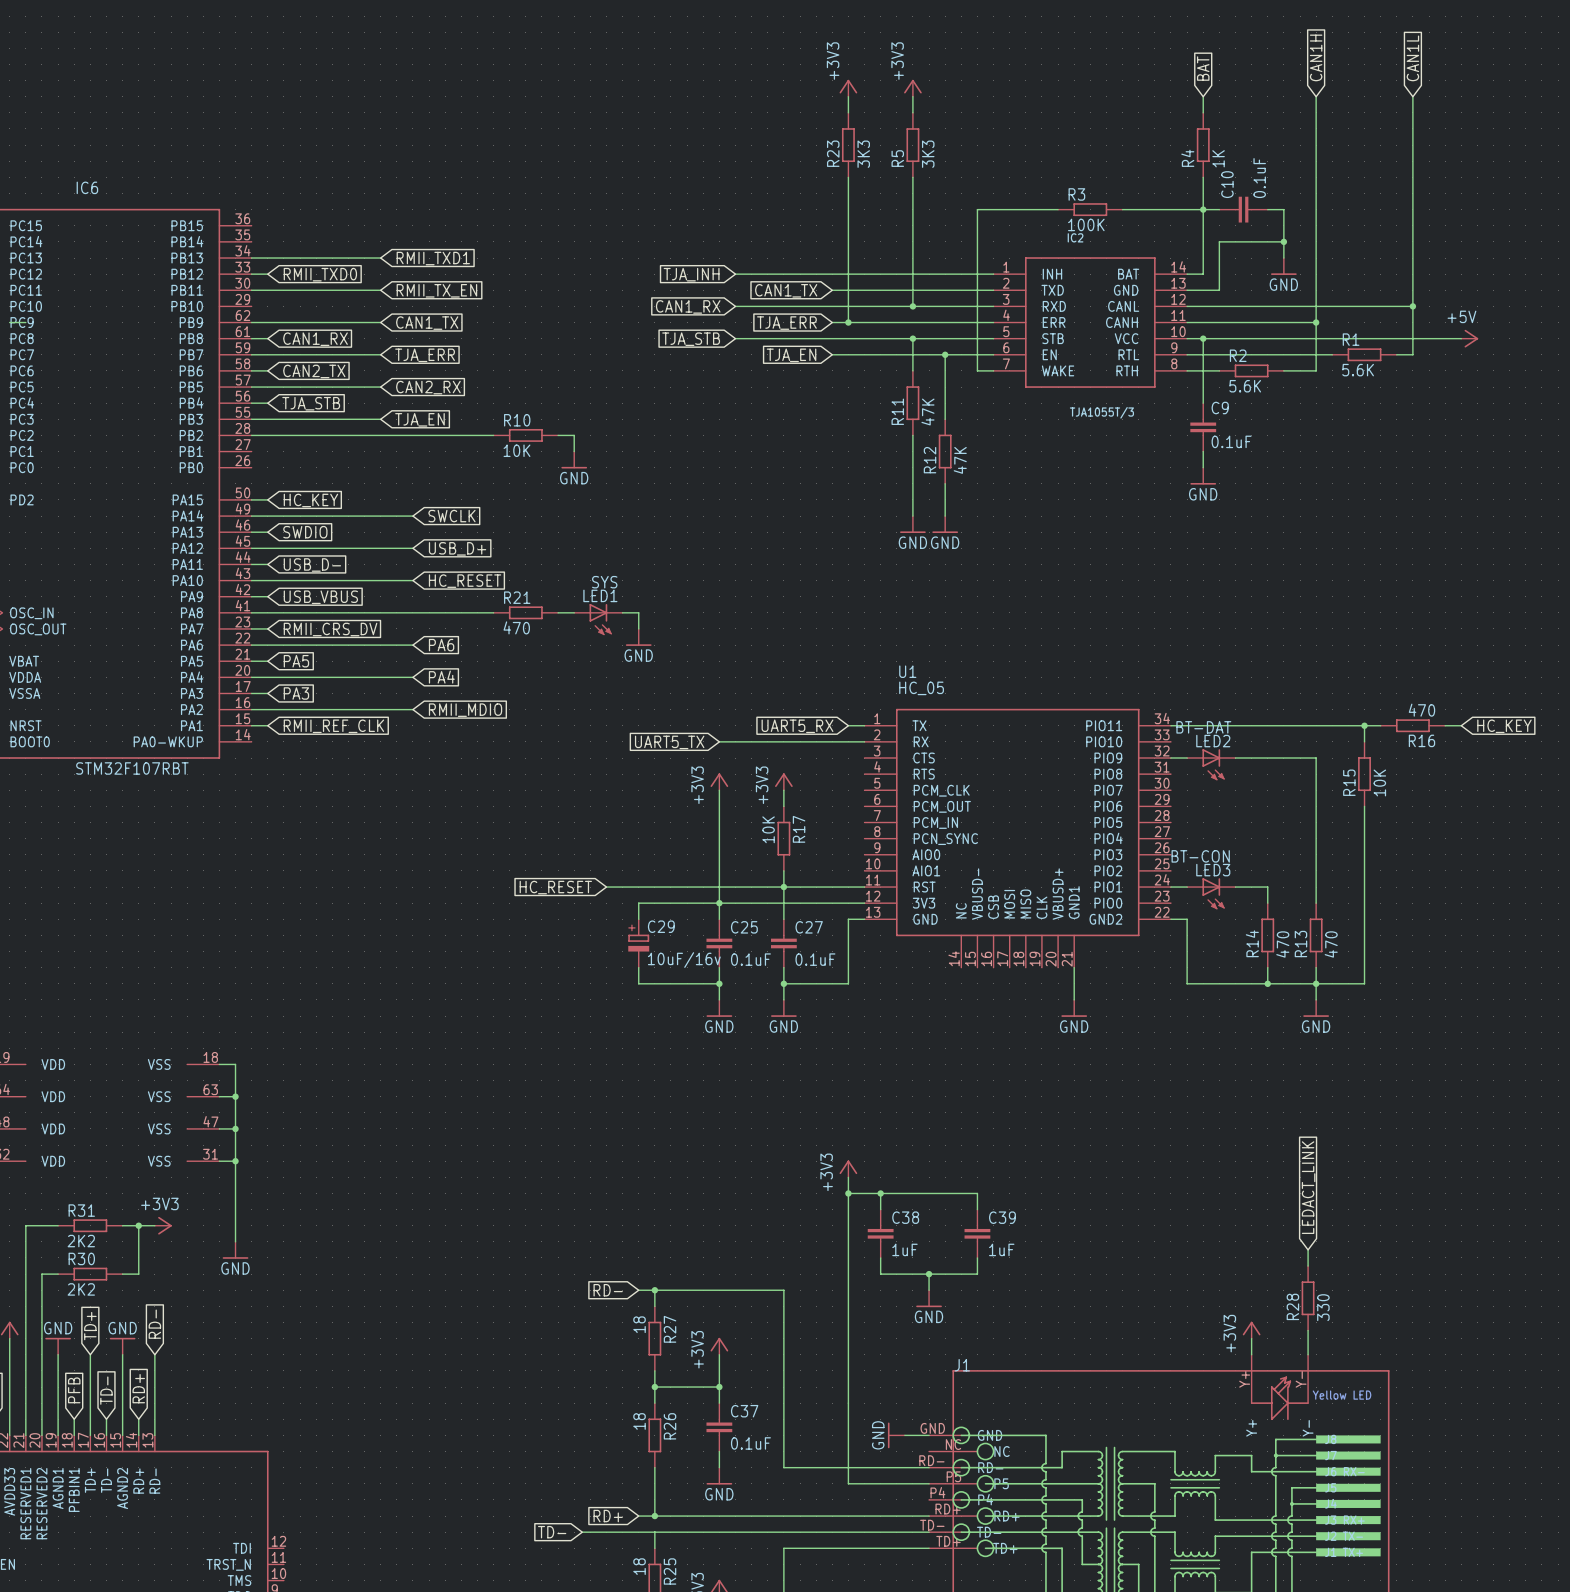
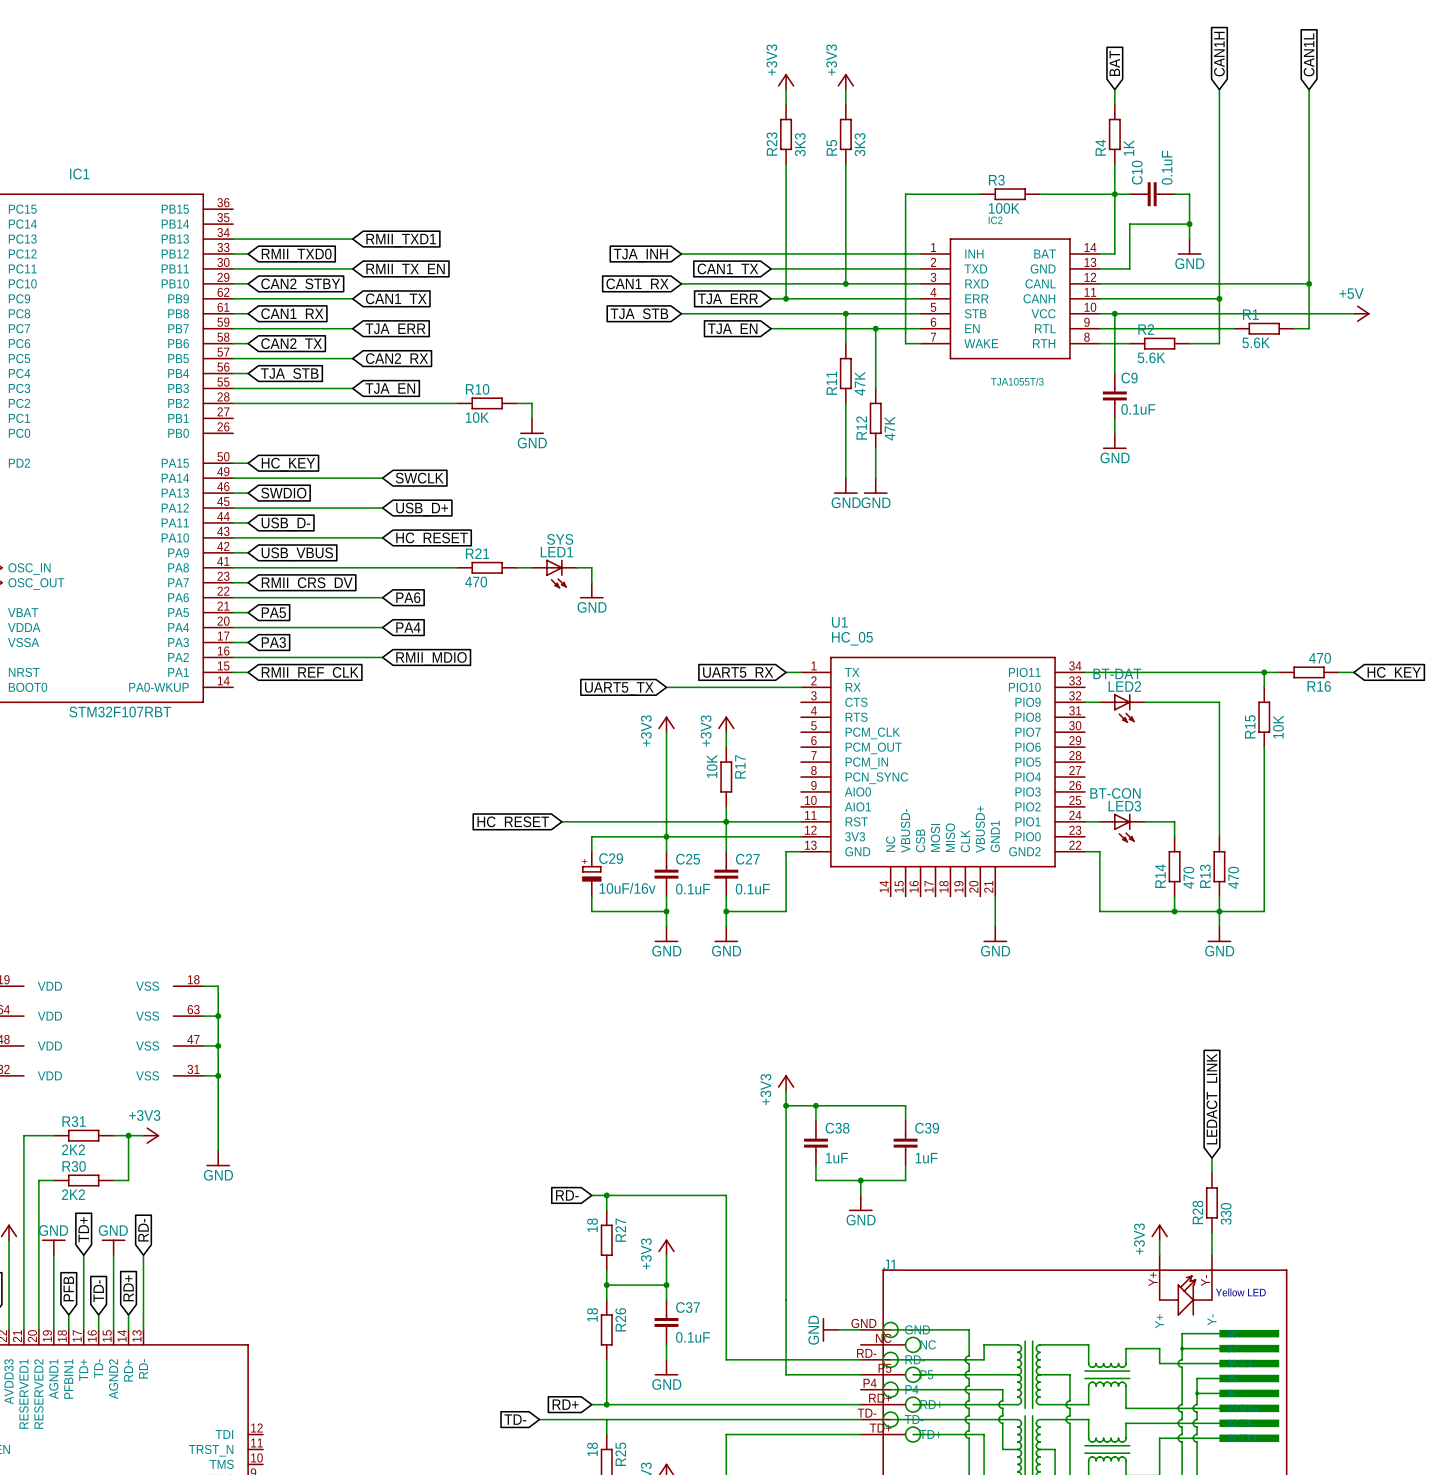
IC6 name: IC6 (87, 187) -> IC1 (79, 174)
wire: none -> (233, 283) (248, 283)
global label: none -> CAN2_STBY (300, 285)
wire: (9, 322) (25, 322) -> none

